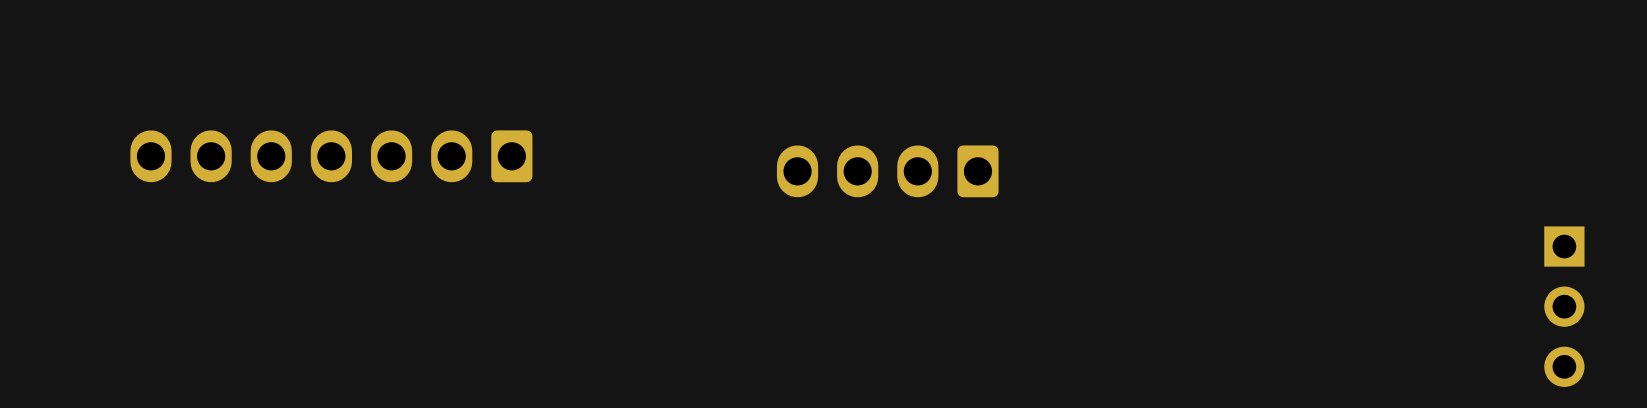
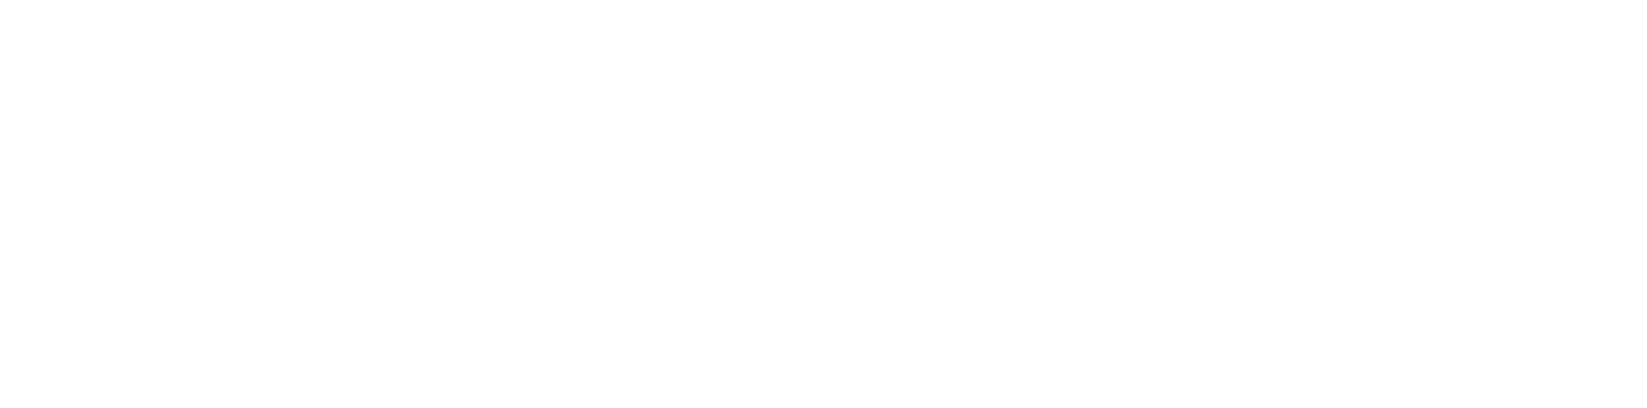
part: (331, 156) -> none
part: (887, 171) -> none
part: (1564, 306) -> none

